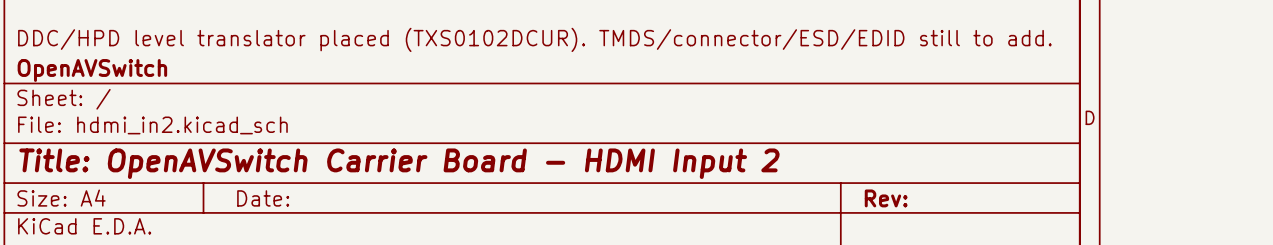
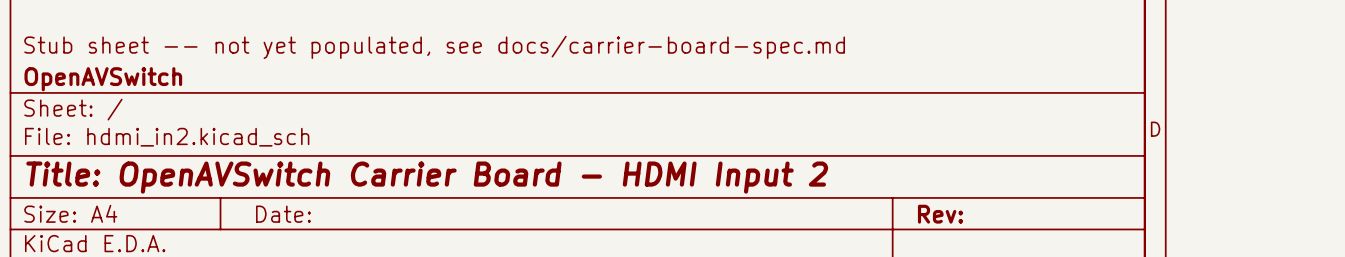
title block: DDC/HPD level translator placed (TXS0102DCUR). TMDS/connector/ESD/EDID still to add. (534, 39) -> Stub sheet -- not yet populated, see docs/carrier-board-spec.md (434, 47)

